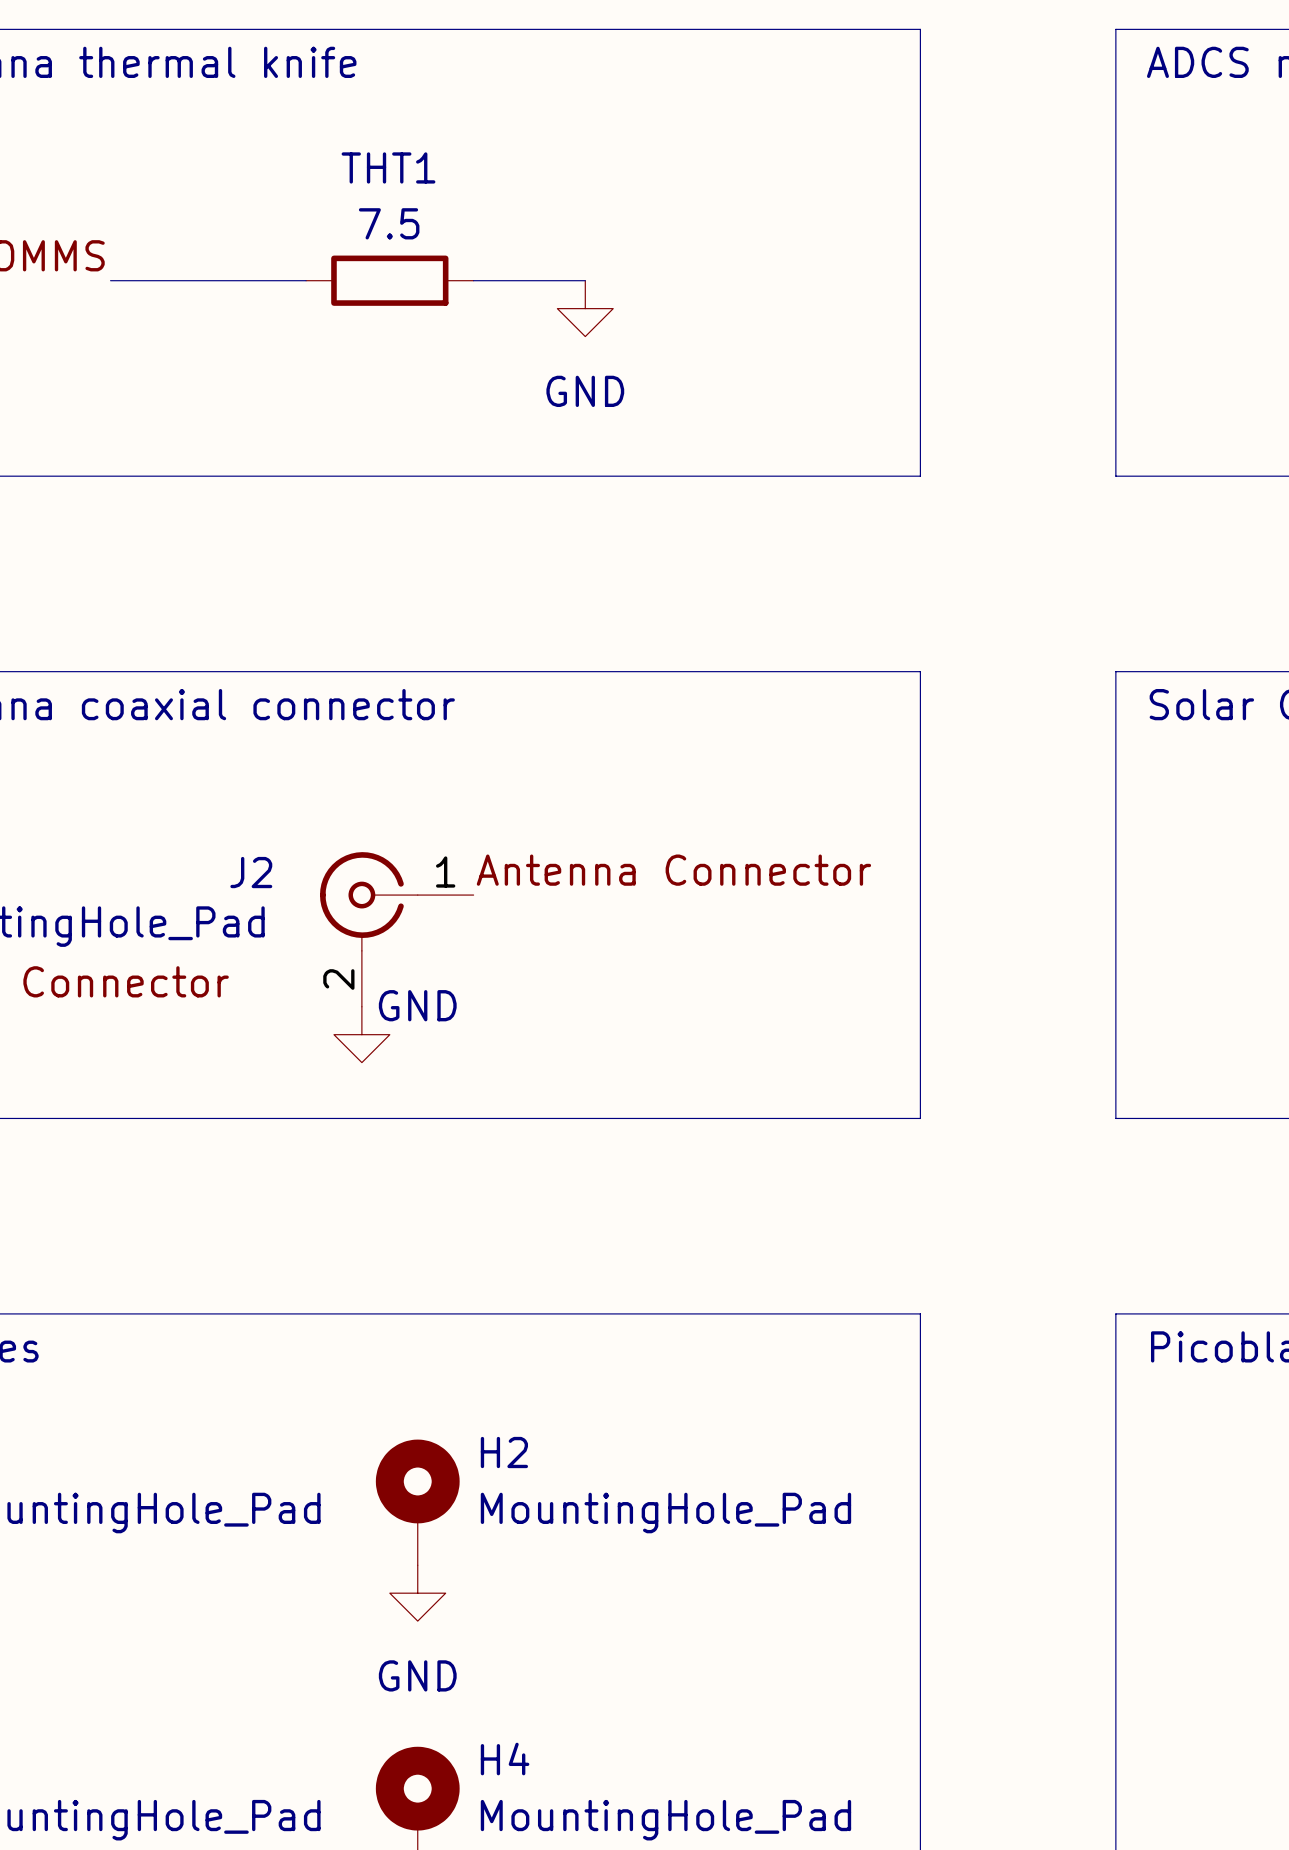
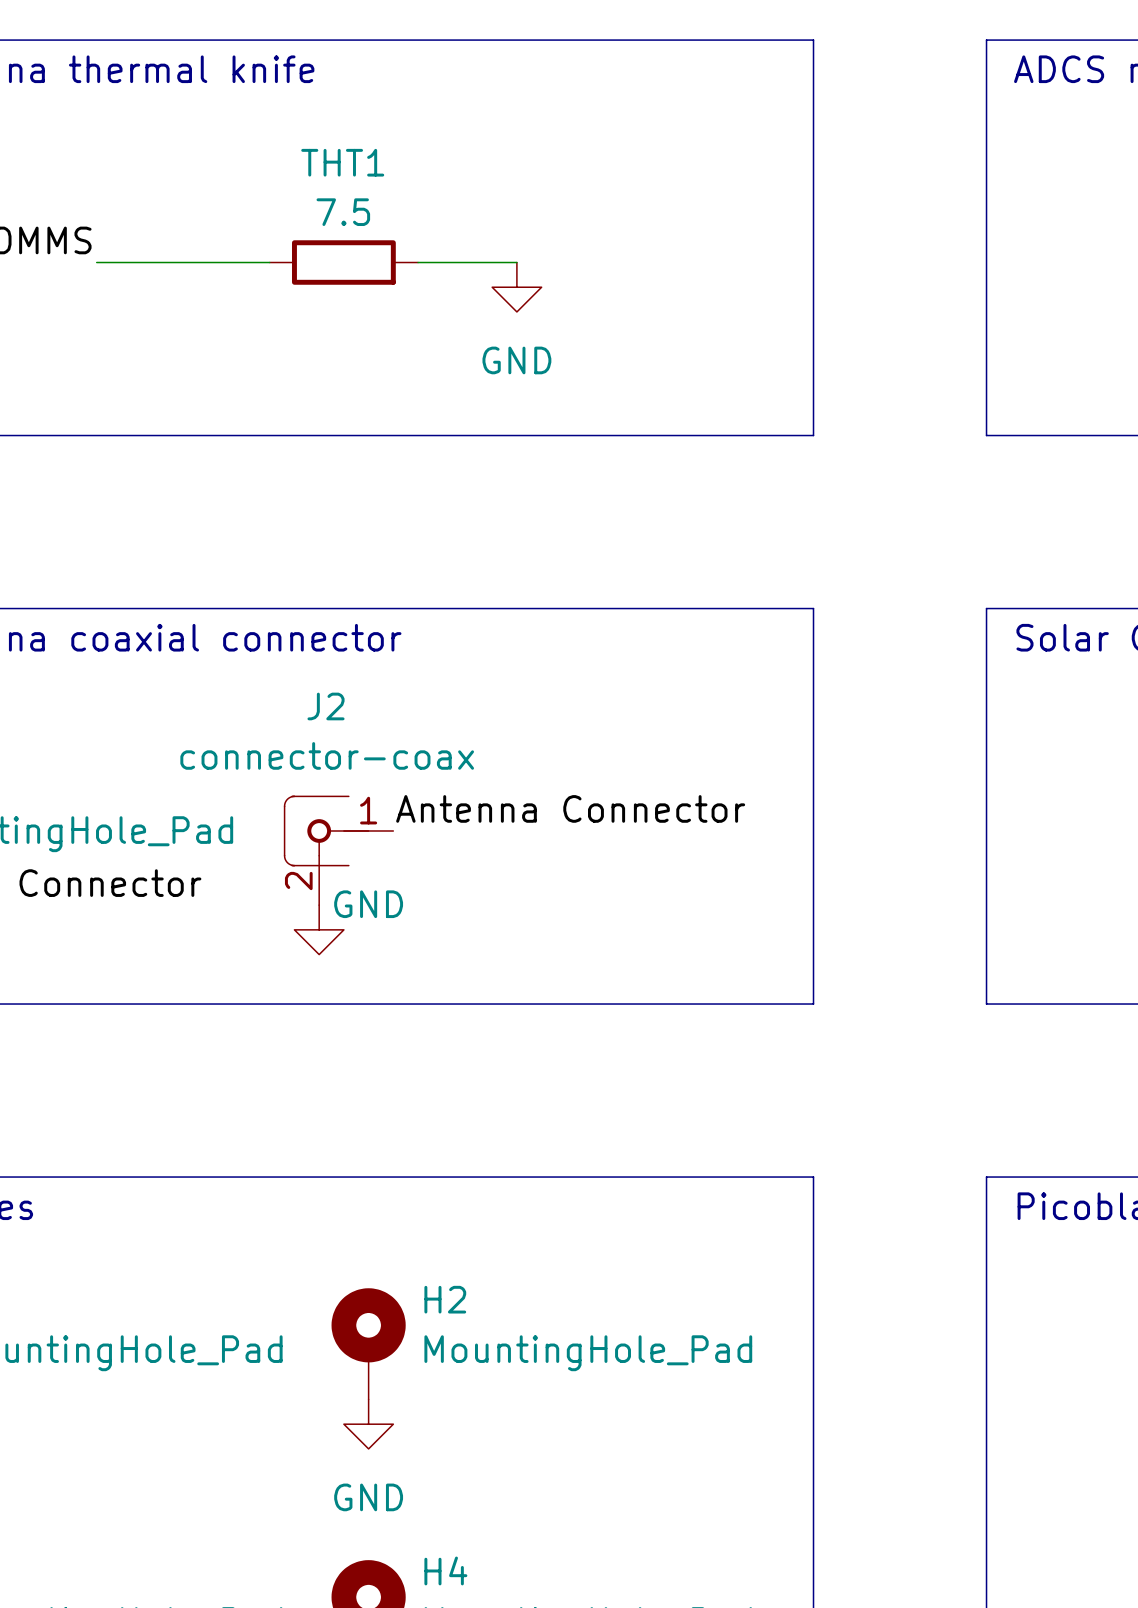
J2 value: none -> connector-coax (327, 755)
J2 symbol: [320, 852, 474, 1007] -> [284, 796, 394, 906]
label position: Antenna Connector (673, 870) -> Antenna Connector (570, 808)
J2 name position: J2 (251, 872) -> J2 (326, 706)

